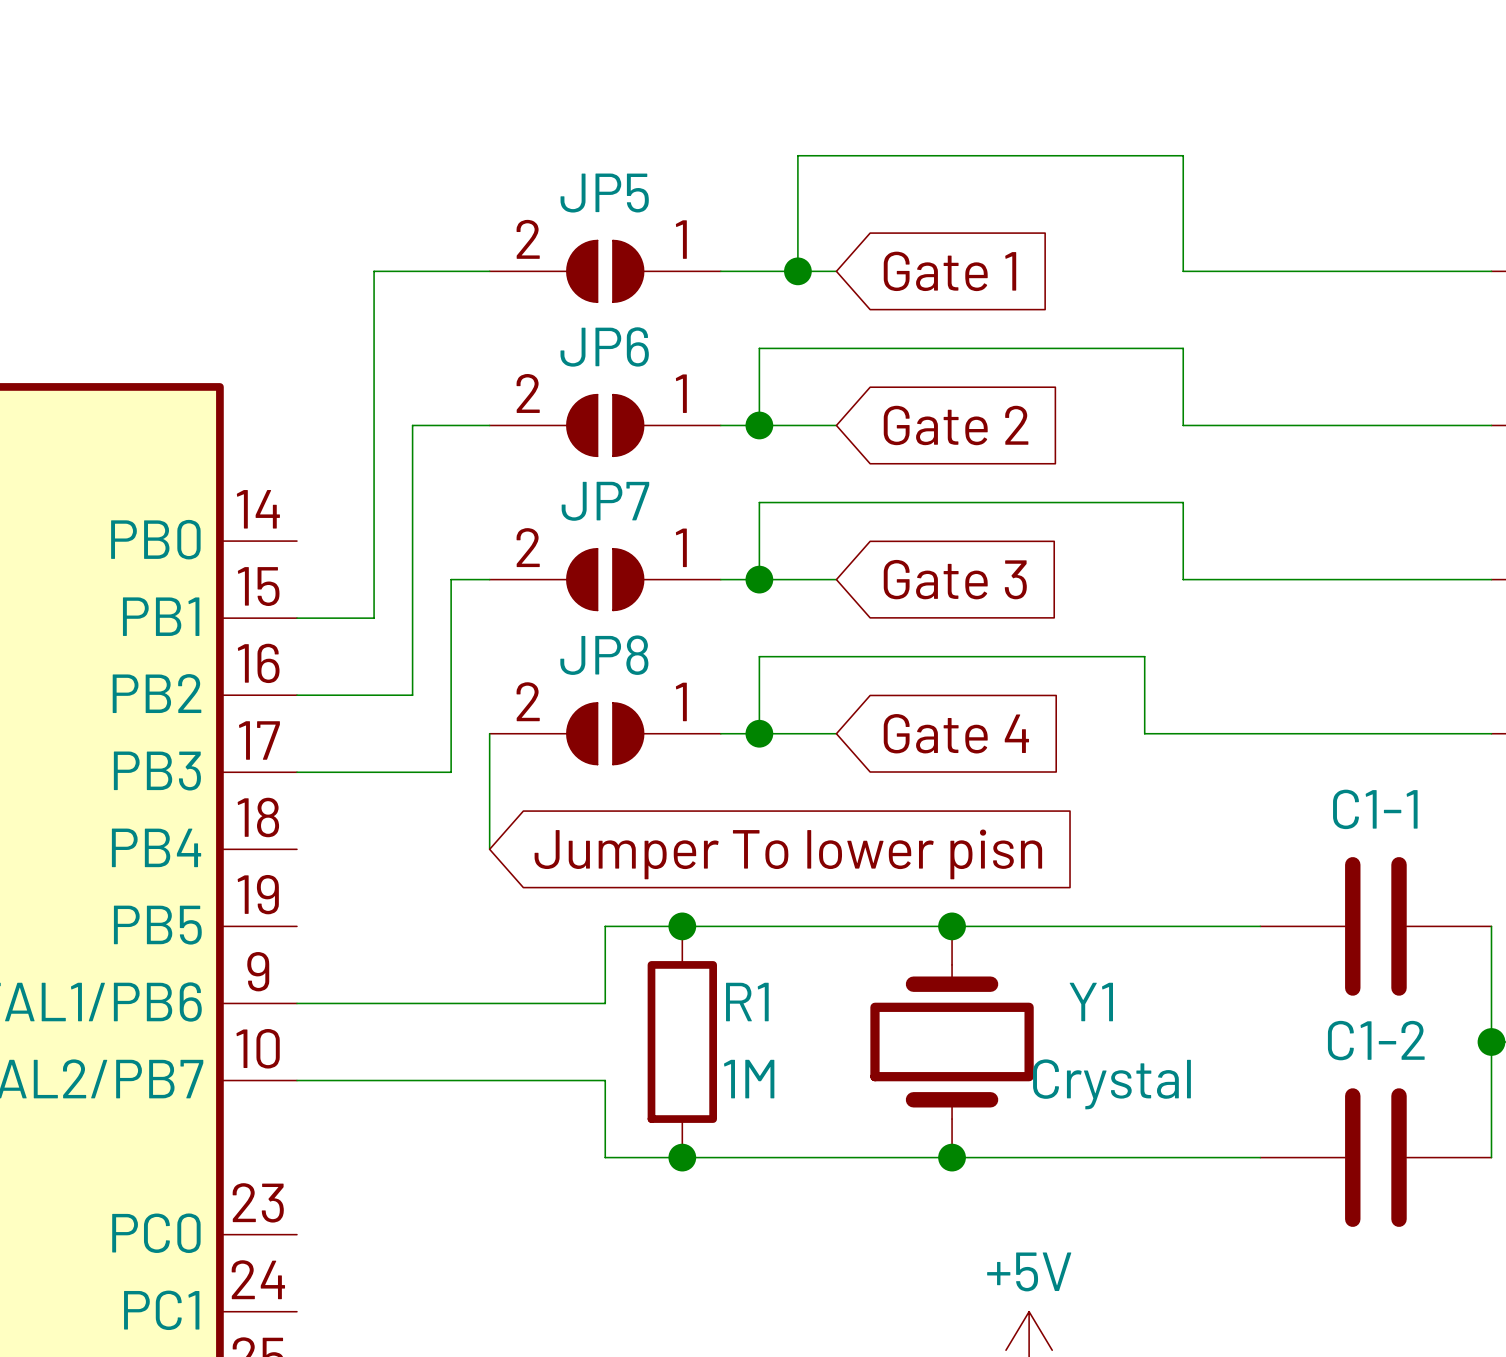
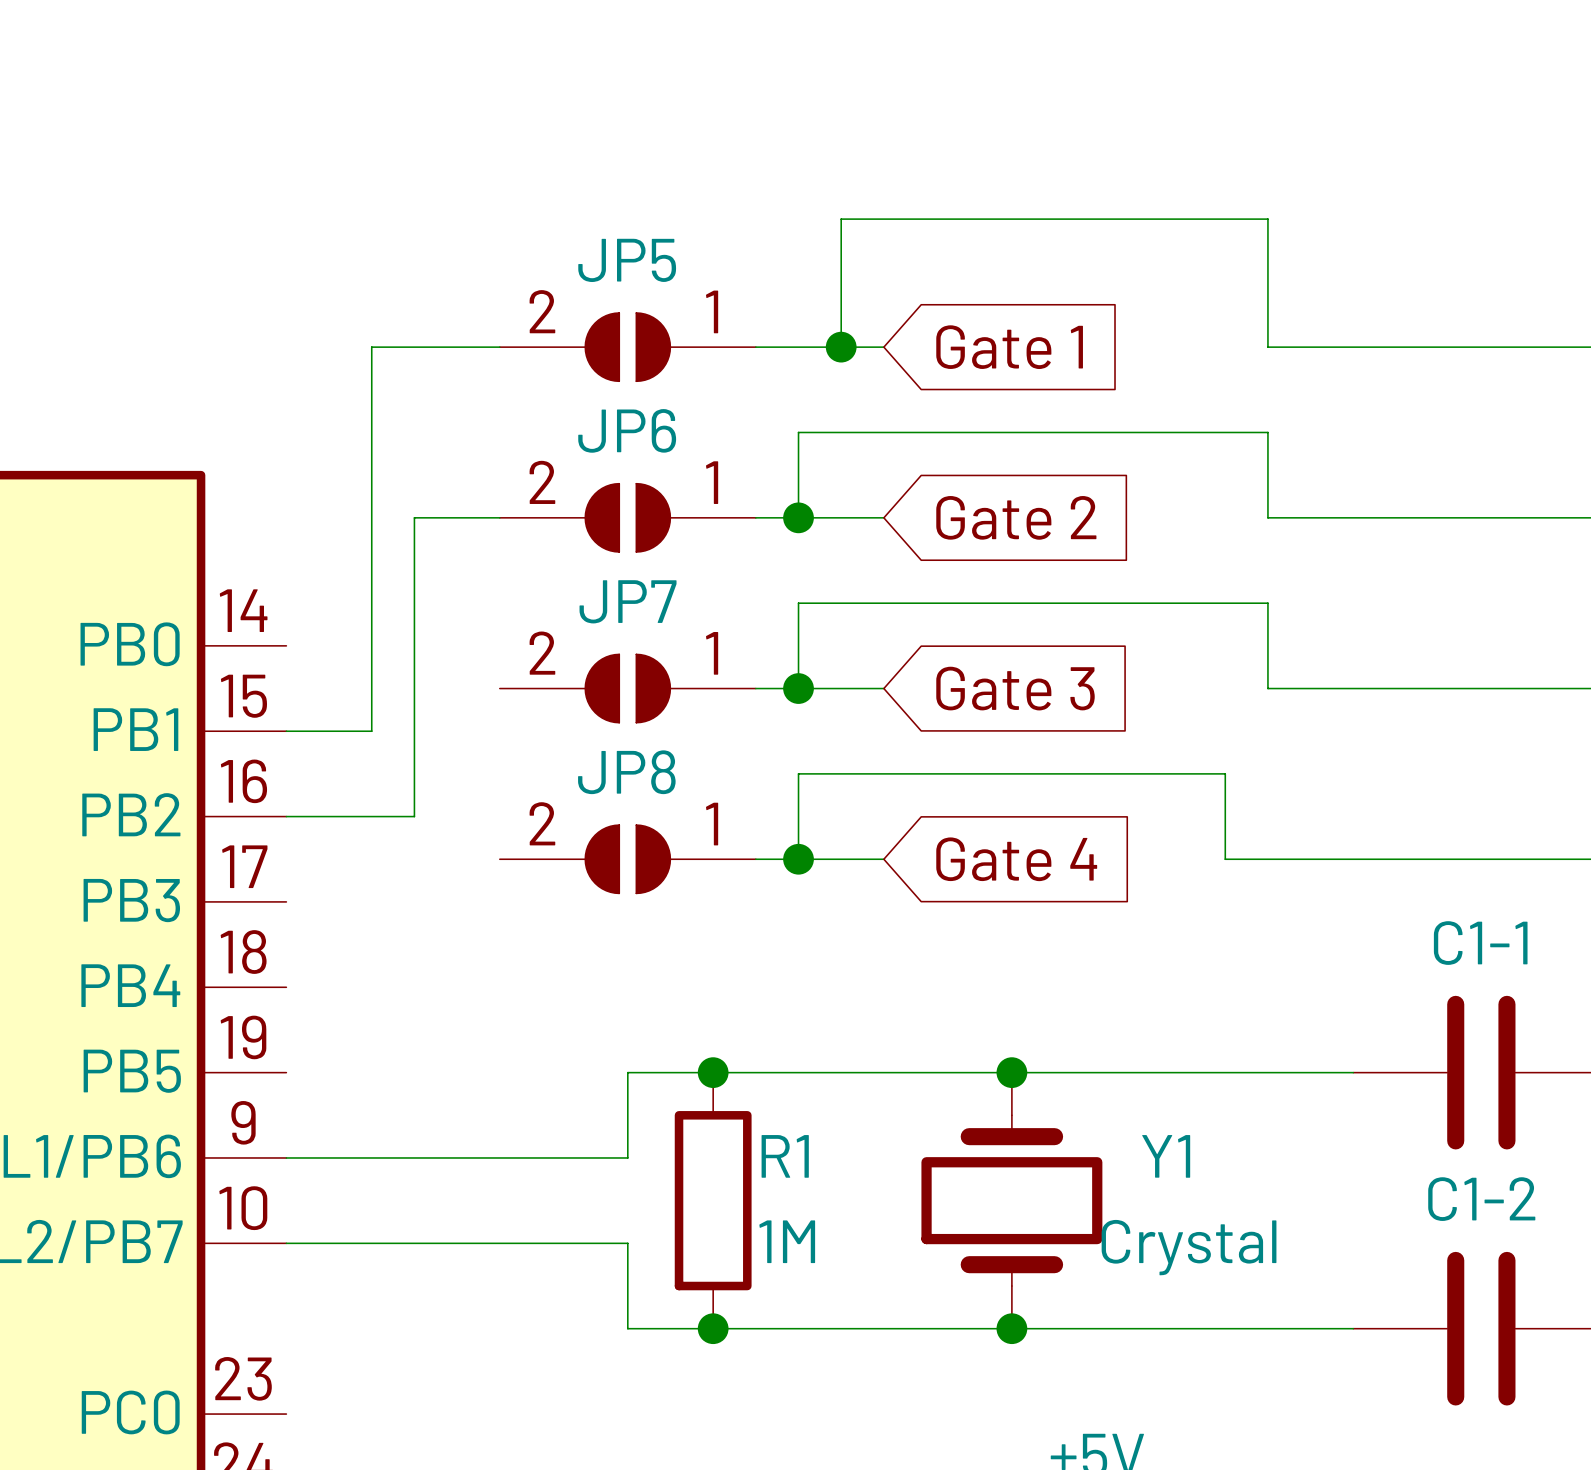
wire: (489, 579) (451, 579) (451, 772) (296, 772) -> none
wire: (489, 733) (489, 849) -> none
global label: Jumper To lower pisn (788, 854) -> none

